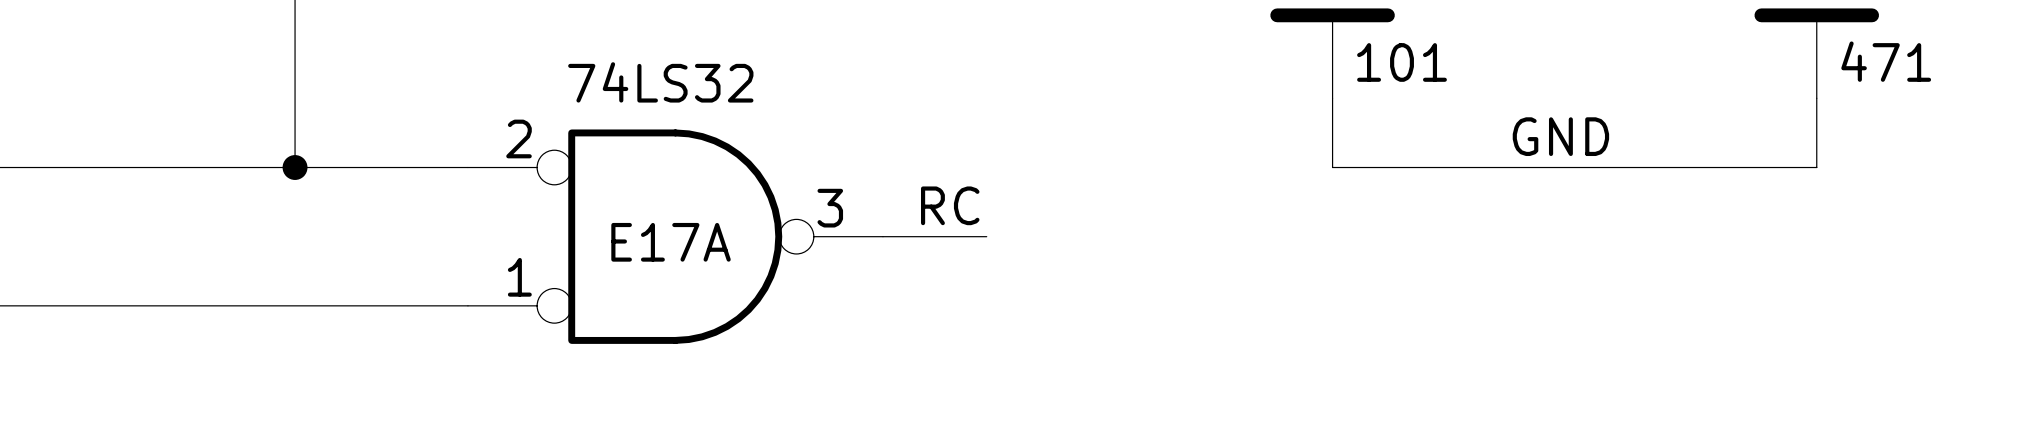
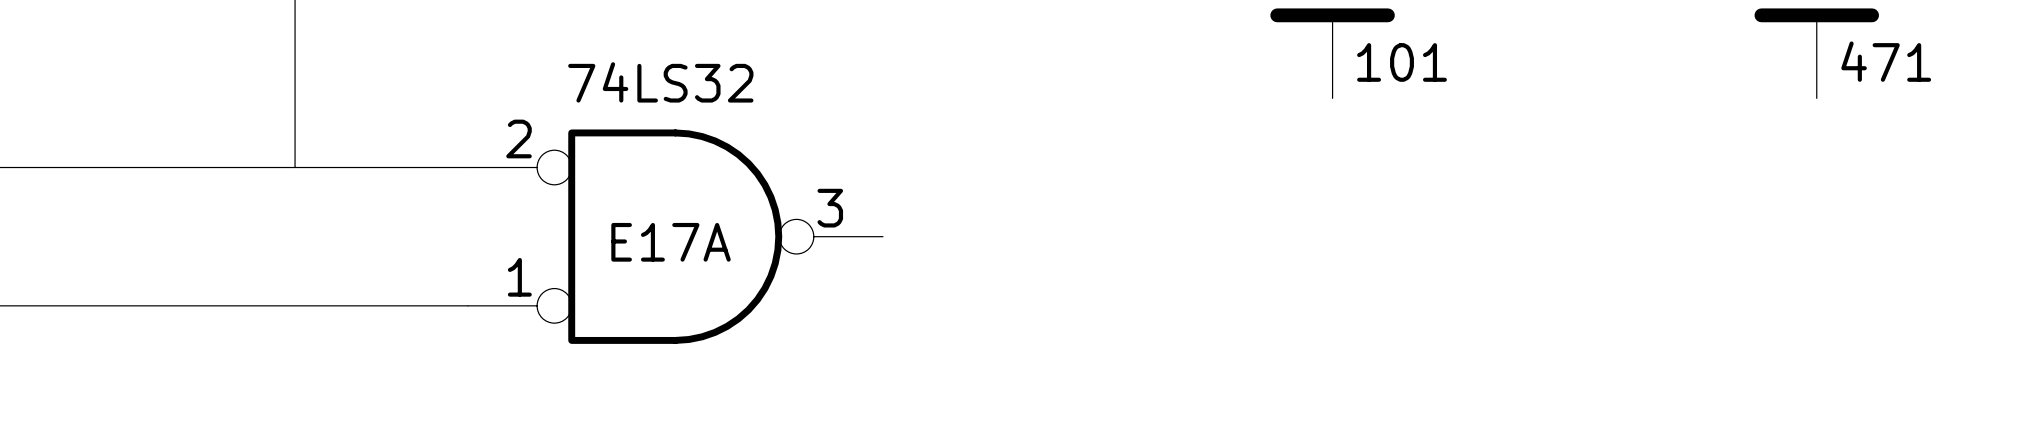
wire: (1332, 98) (1332, 167) (1816, 167) (1816, 98) -> none
label: GND (1560, 136) -> none
junction: (295, 167) -> none
label: RC (950, 205) -> none
wire: (882, 236) (986, 236) -> none

